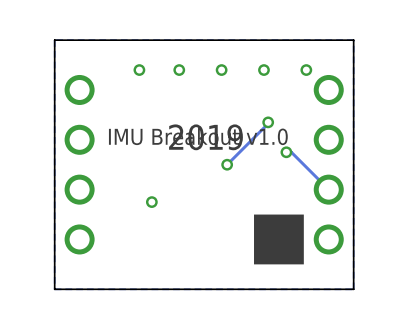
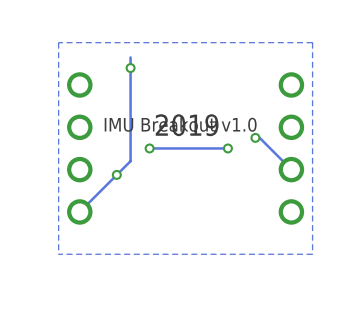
board edge: (353, 40) (54, 40) (54, 289) (353, 289) (353, 40) -> none
track: none -> (130, 57) (130, 161) (79, 211)
via: (179, 70) -> none
via: (221, 70) -> none
via: (263, 70) -> none
via: (306, 70) -> none
track: (268, 122) (227, 164) -> none
via: (268, 122) -> none
via: none -> (149, 148)
via: (227, 164) -> none
track: none -> (227, 148) (149, 148)
via: none -> (227, 148)
via: none -> (116, 174)
via: (151, 202) -> none
drawing: [254, 214, 304, 265] -> none

